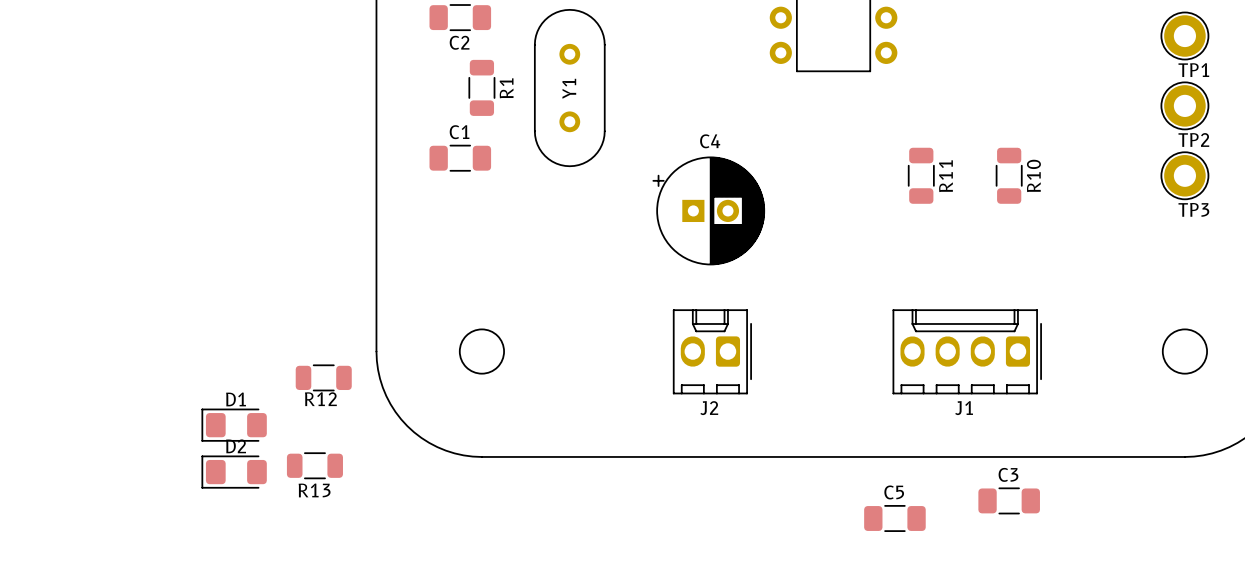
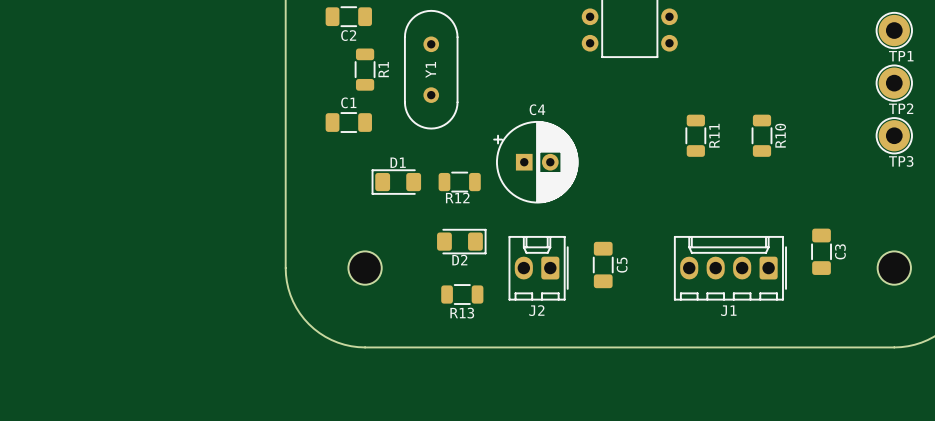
R12 position: (323, 377) -> (459, 182)
D1 position: (234, 425) -> (396, 182)
R13 position: (314, 465) -> (462, 294)
D2 rotation: 0° (234, 472) -> 180° (461, 241)
D2 position: (234, 472) -> (461, 241)
C3 rotation: 0° (1009, 500) -> 90° clockwise (821, 251)
C3 position: (1009, 500) -> (821, 251)
C5 rotation: 0° (894, 518) -> 90° clockwise (603, 265)
C5 position: (894, 518) -> (603, 265)

